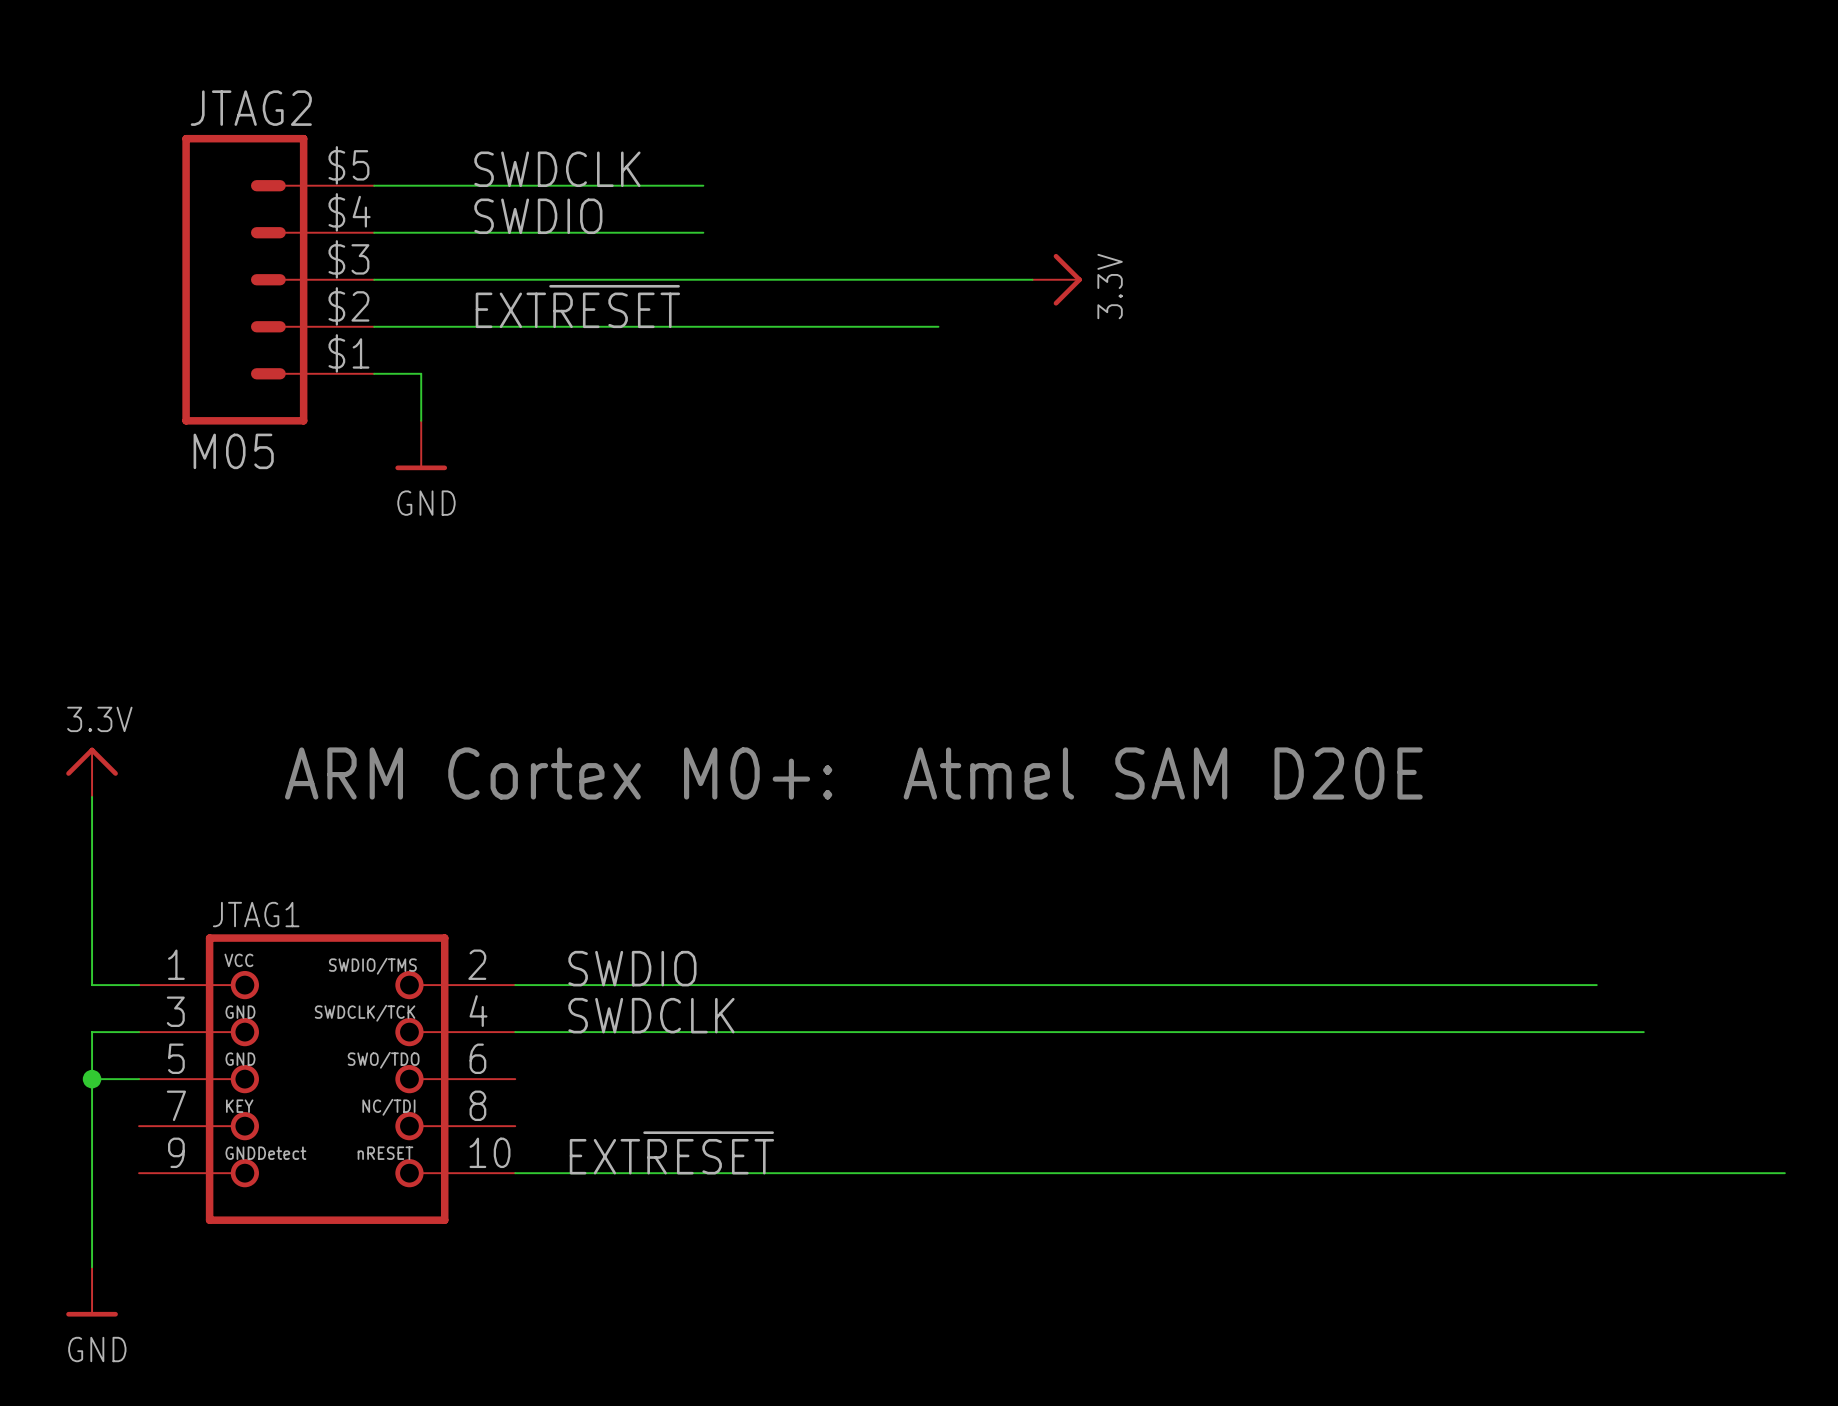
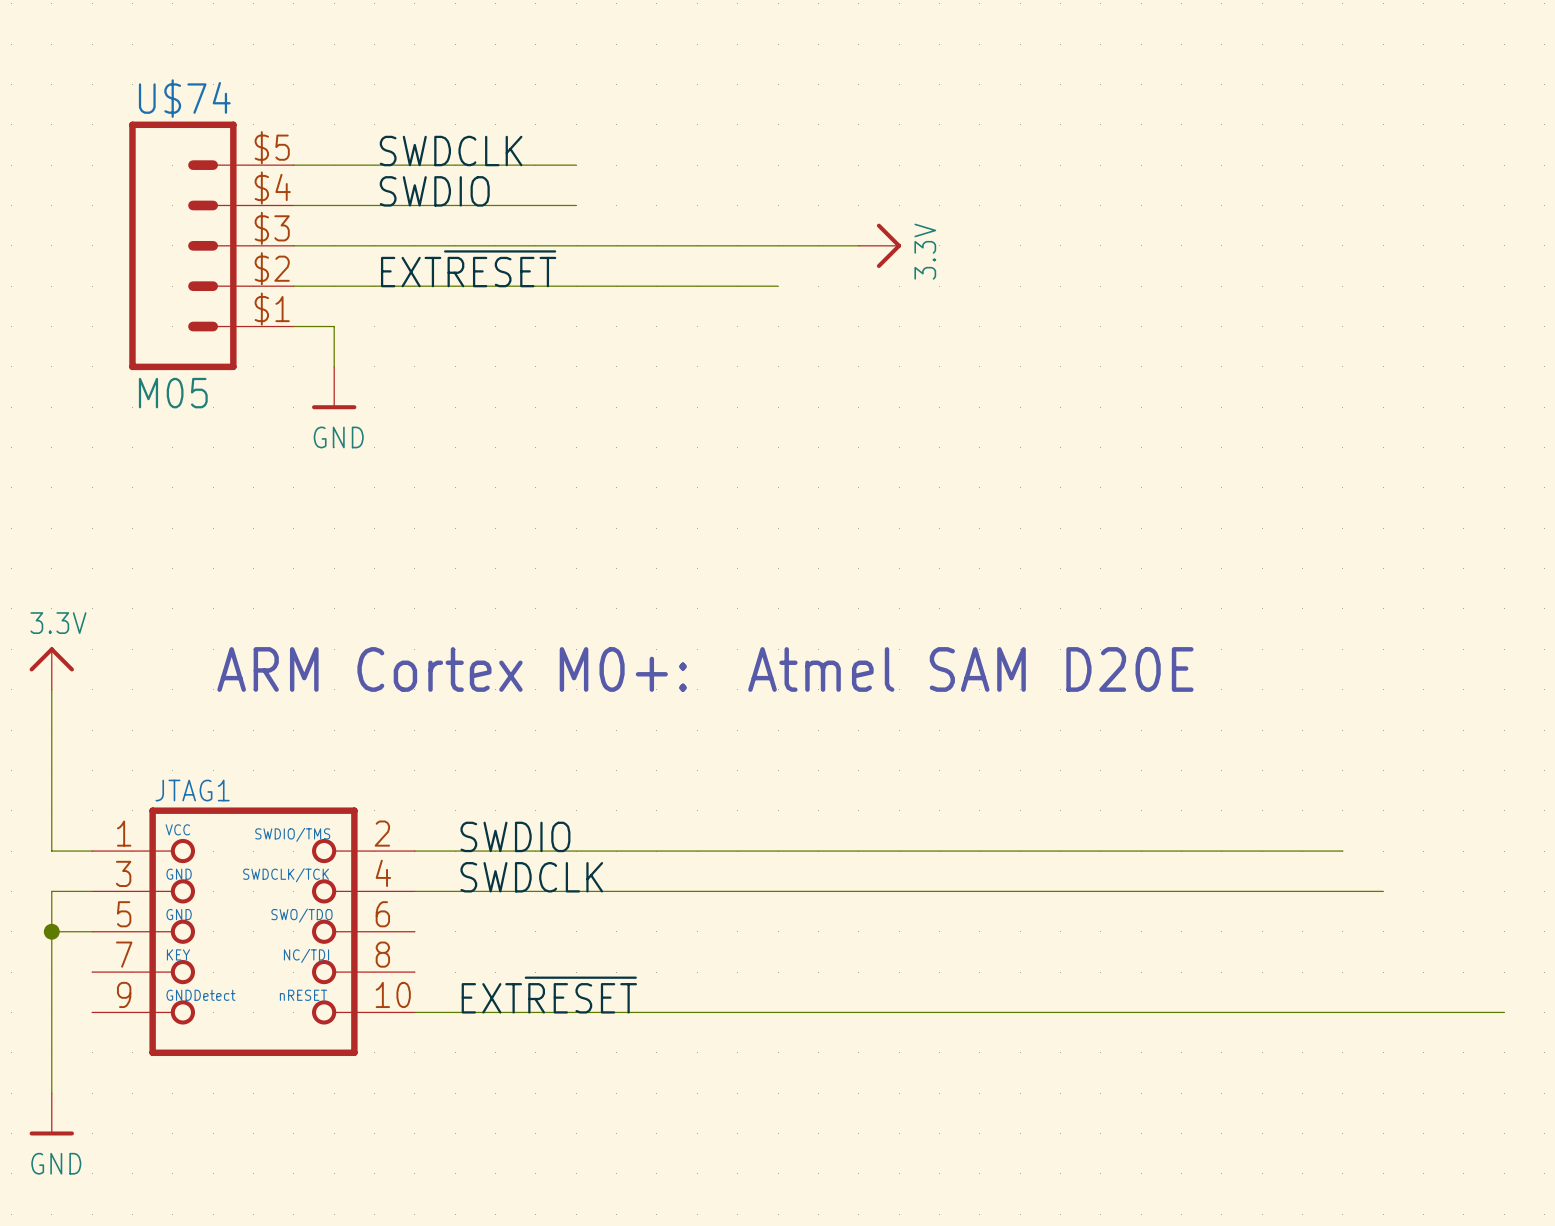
JTAG2 name: JTAG2 (251, 108) -> U$74 (184, 98)

